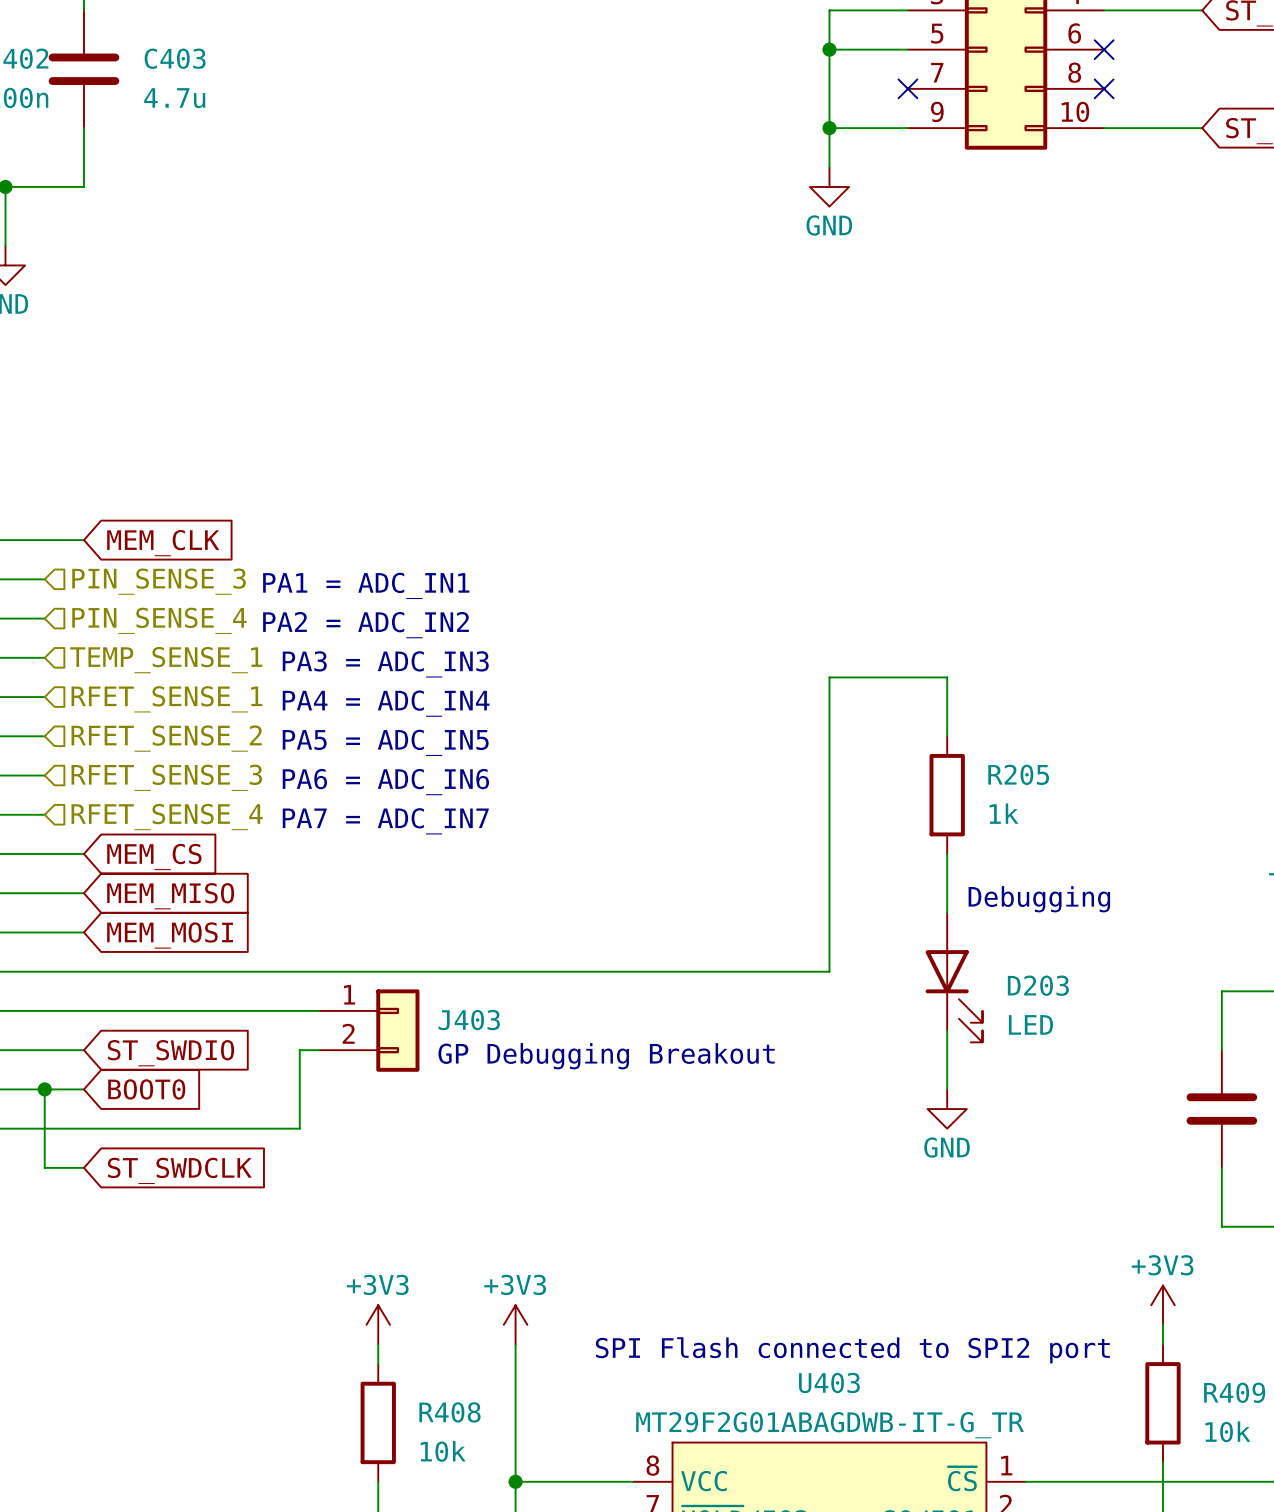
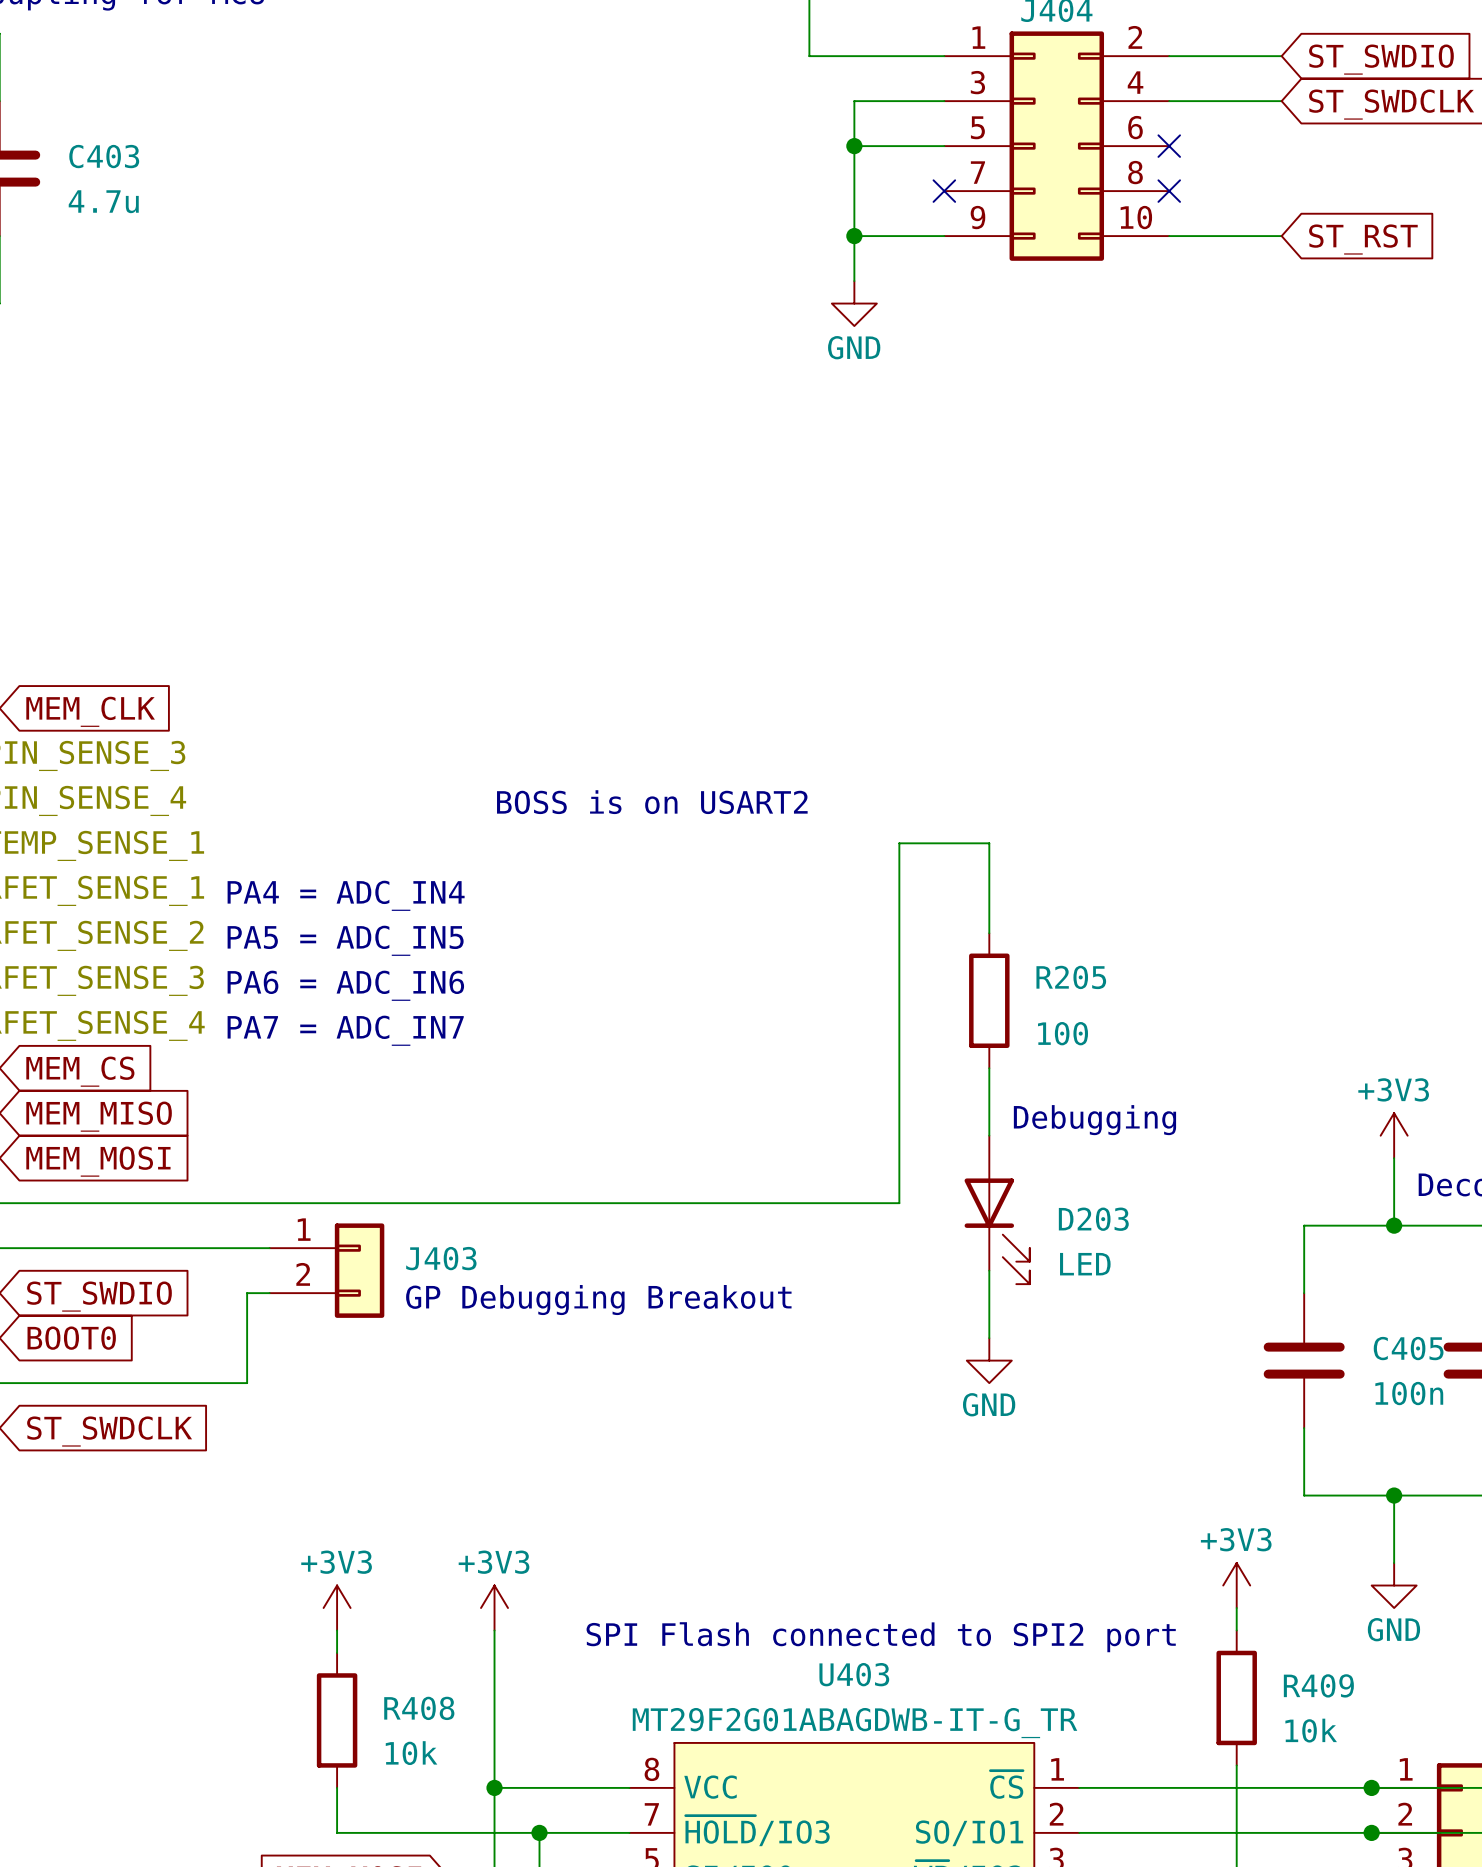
text: PA1 = ADC_IN1 (366, 585) -> none
text: none -> BOSS is on USART2 (652, 802)
text: PA2 = ADC_IN2 (366, 625) -> none
text: PA3 = ADC_IN3 (385, 664) -> none
wire: (947, 677) (829, 677) (829, 971) -> (989, 865) (989, 843) (899, 843) (899, 1203) (854, 1203)
R205 value: 1k (1004, 813) -> 100 (1063, 1033)

